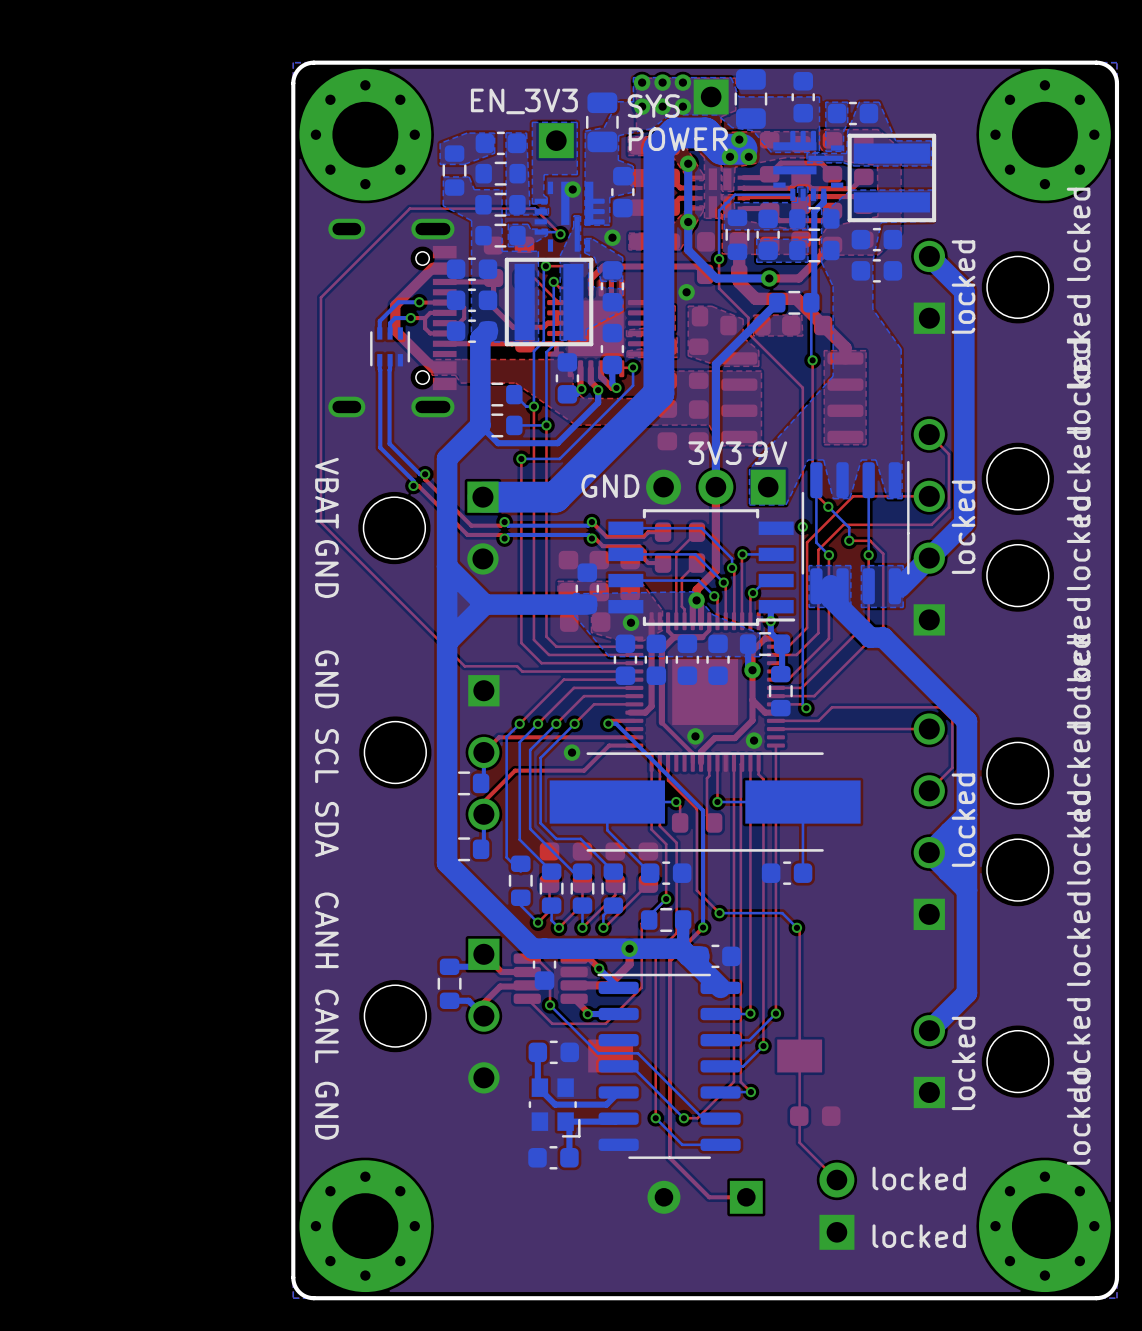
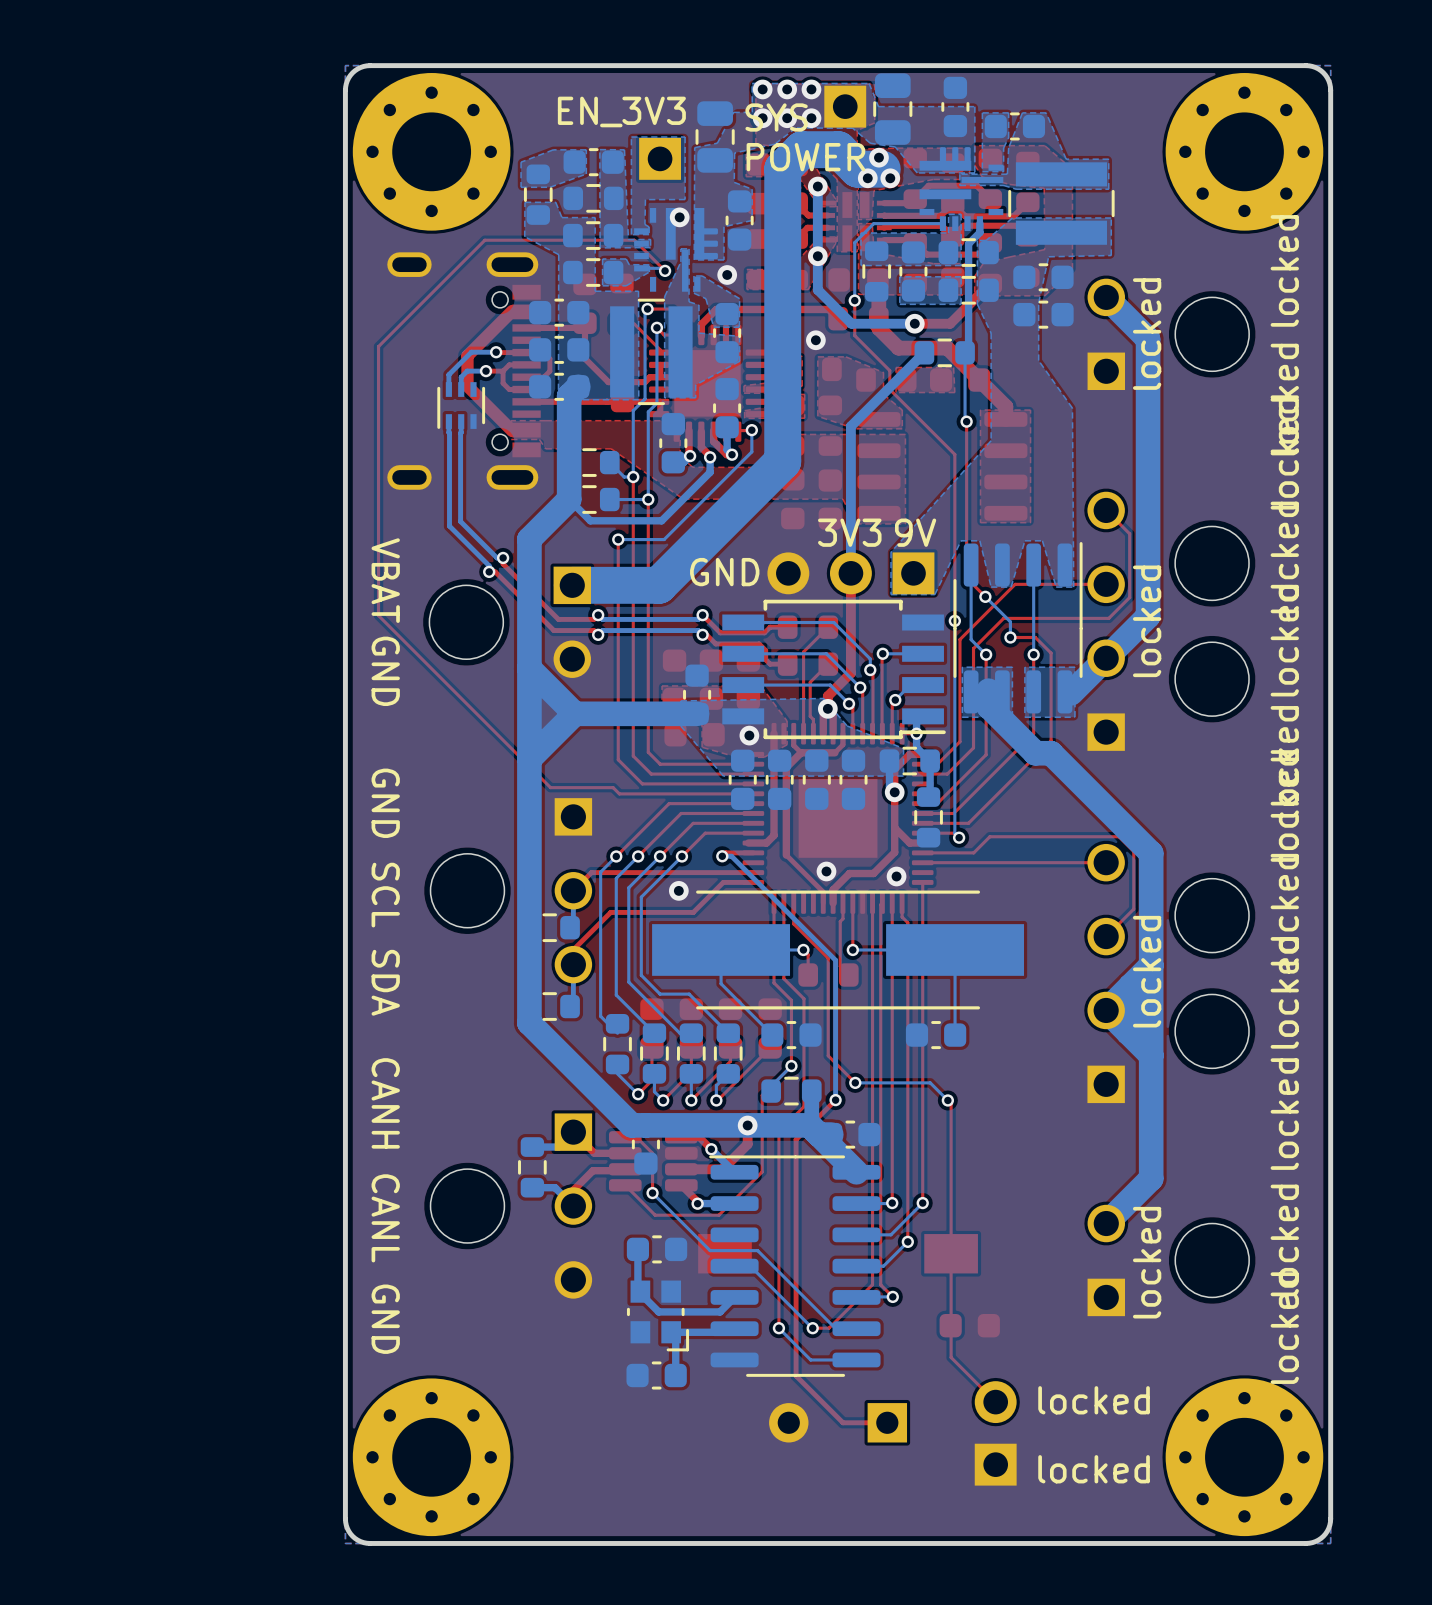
part footprint: [847, 133, 937, 223] -> [1008, 162, 1115, 245]
part footprint: [504, 257, 594, 347] -> [610, 298, 693, 406]

